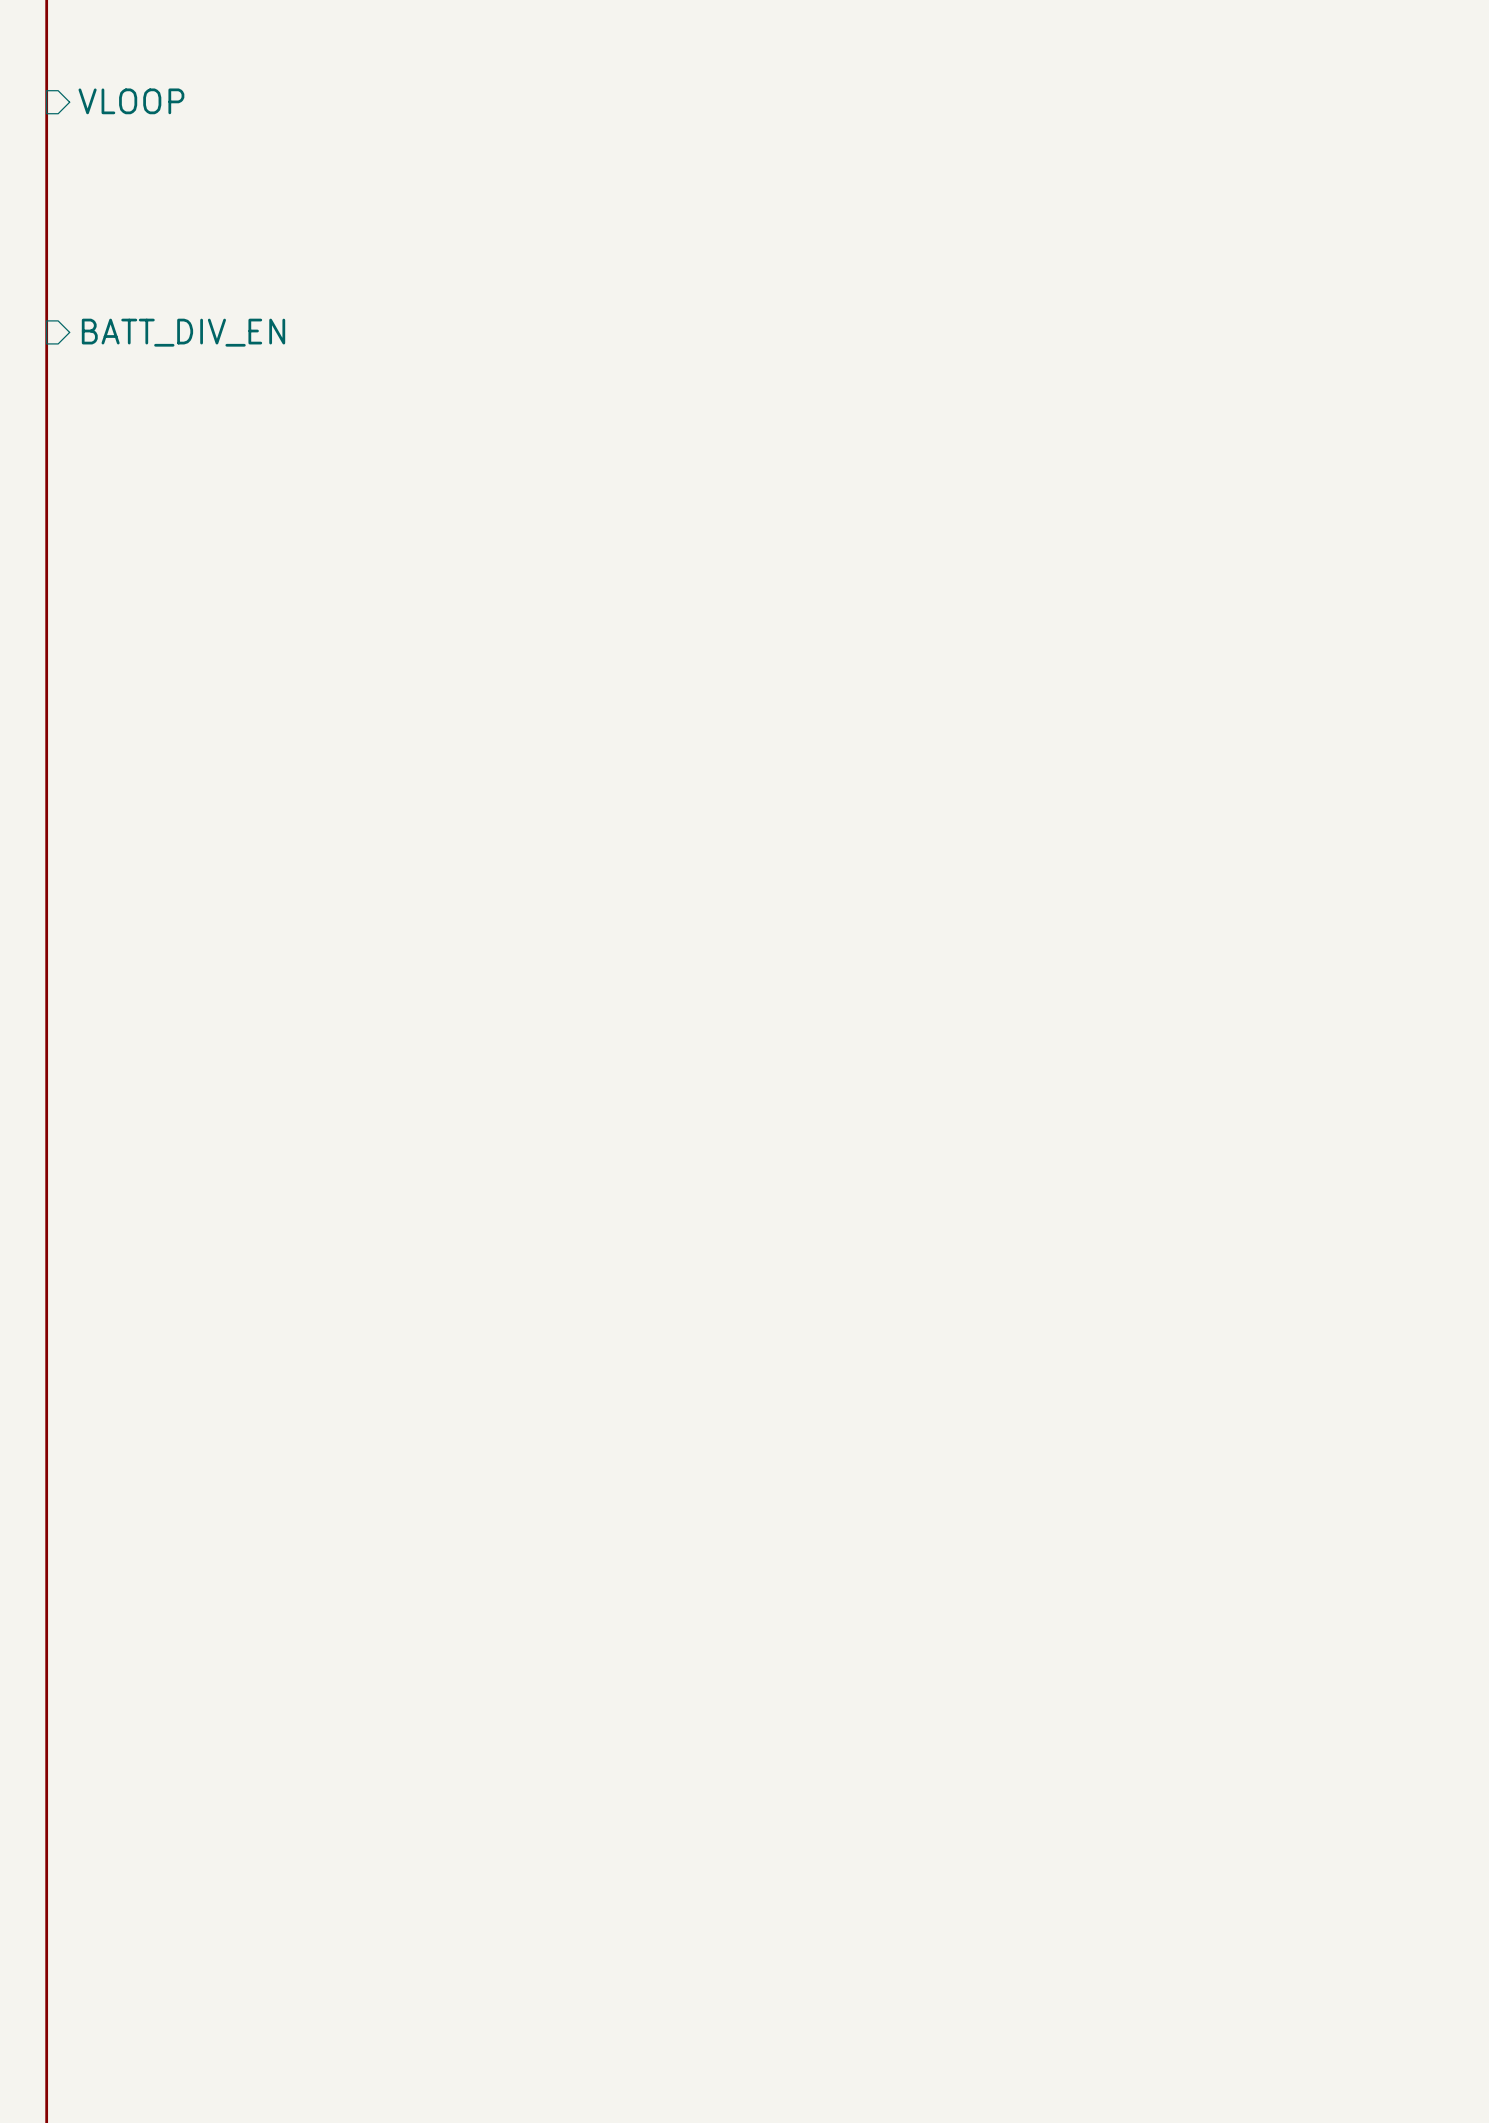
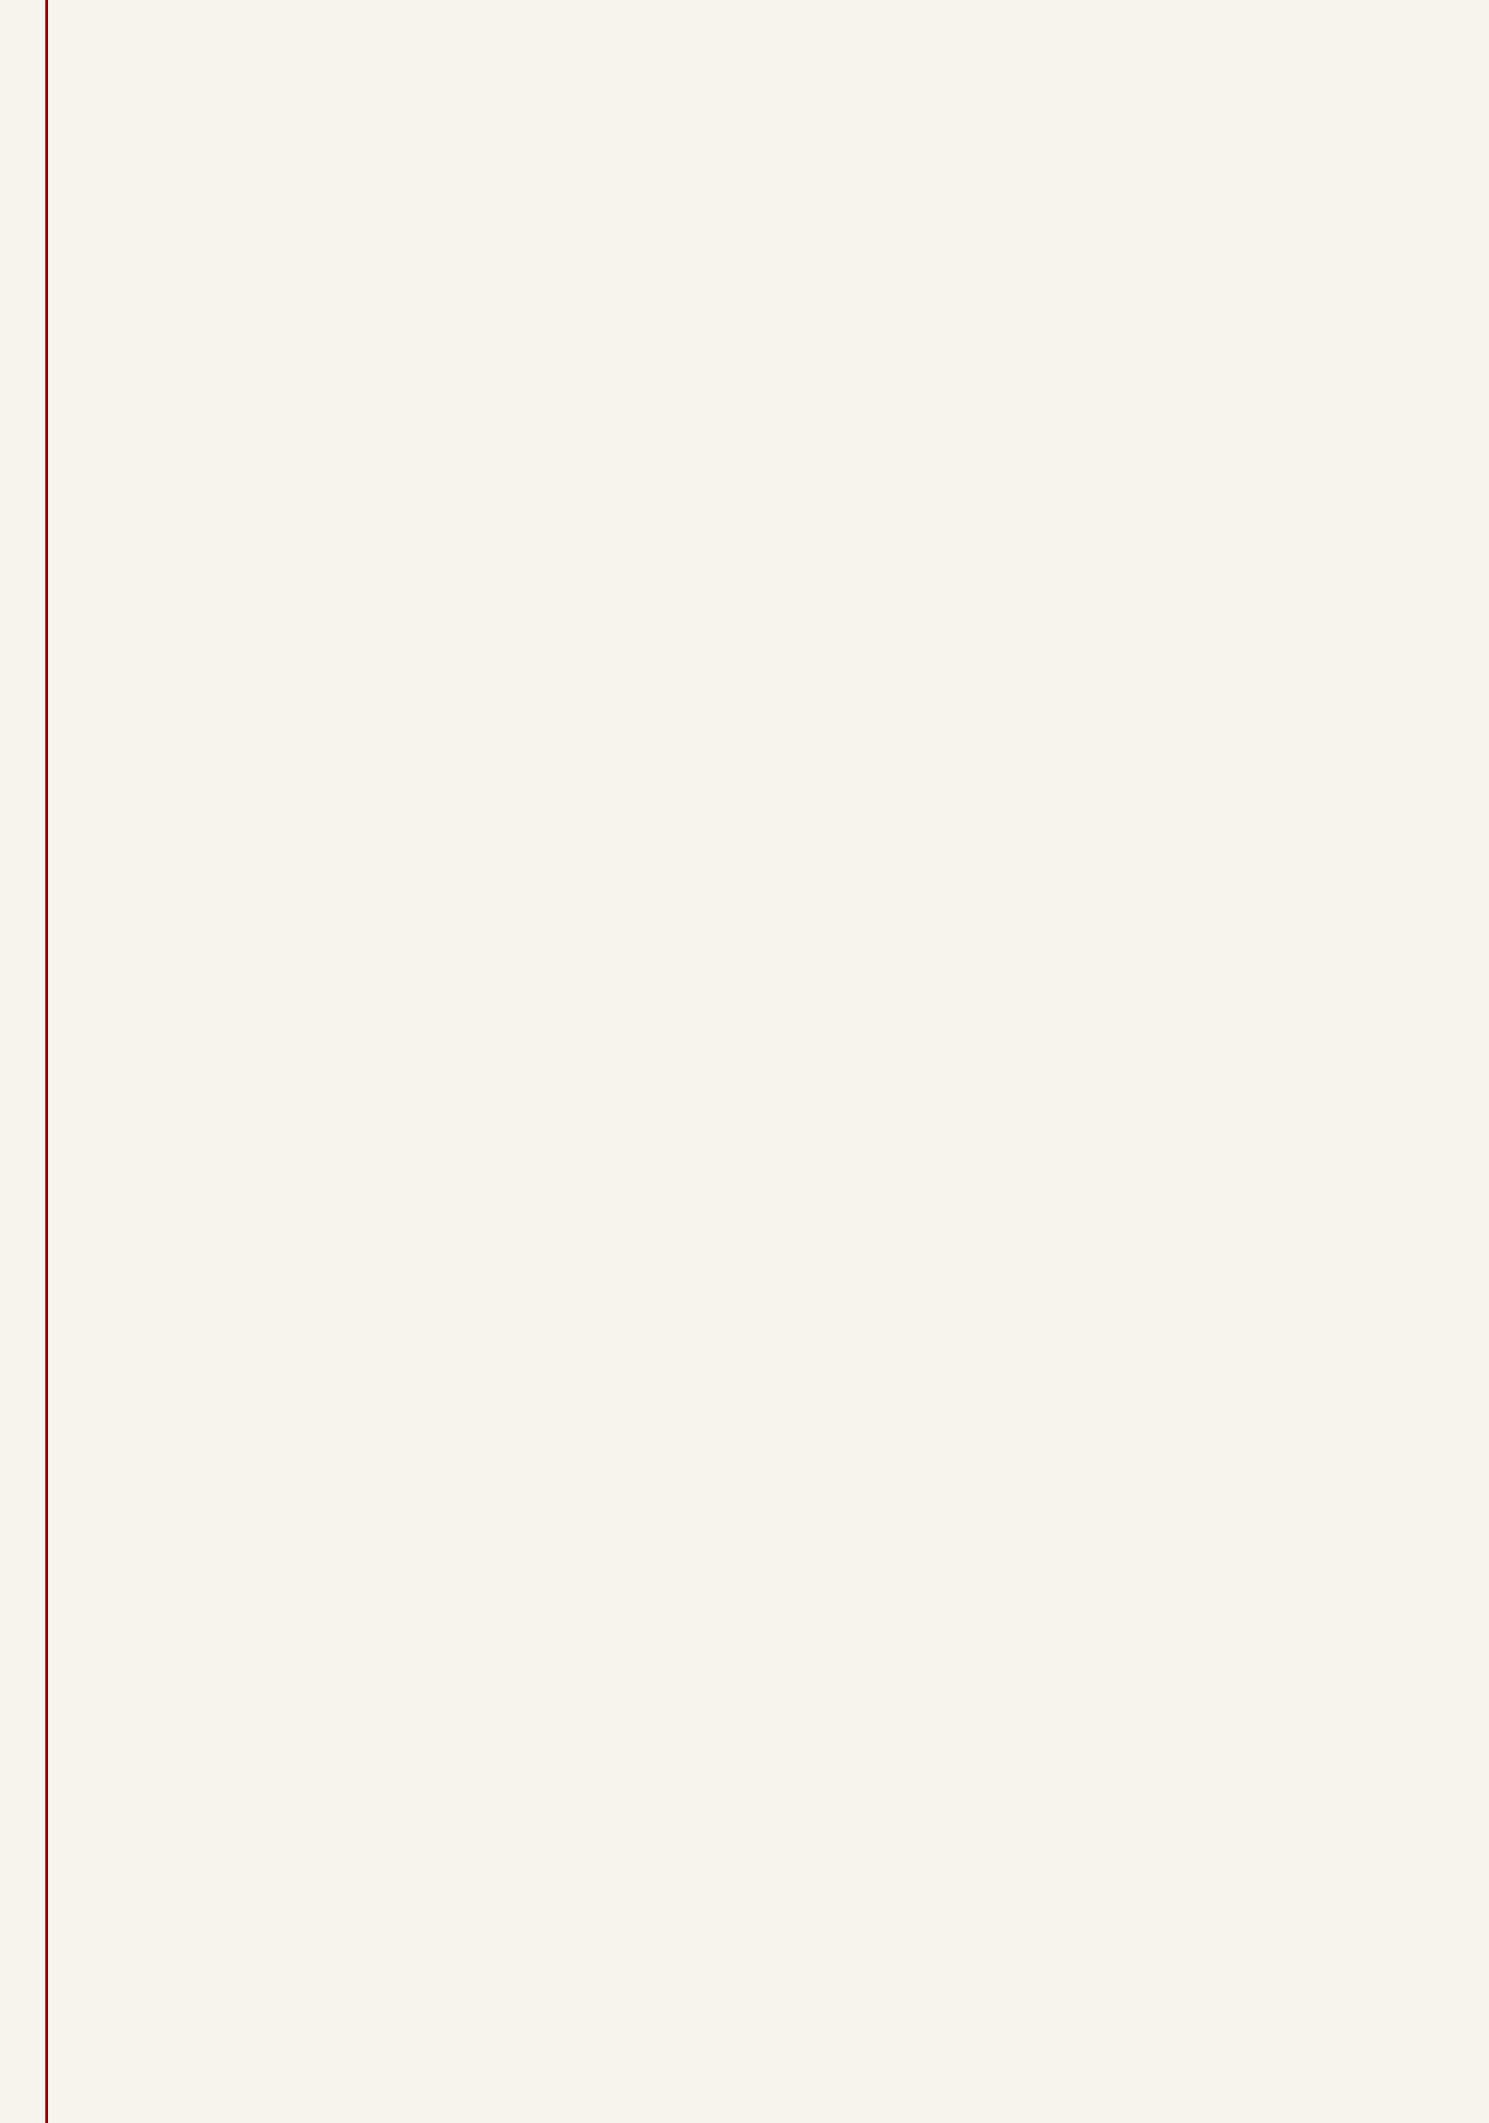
sheet pin: VLOOP (131, 101) -> none
sheet pin: BATT_DIV_EN (183, 332) -> none

